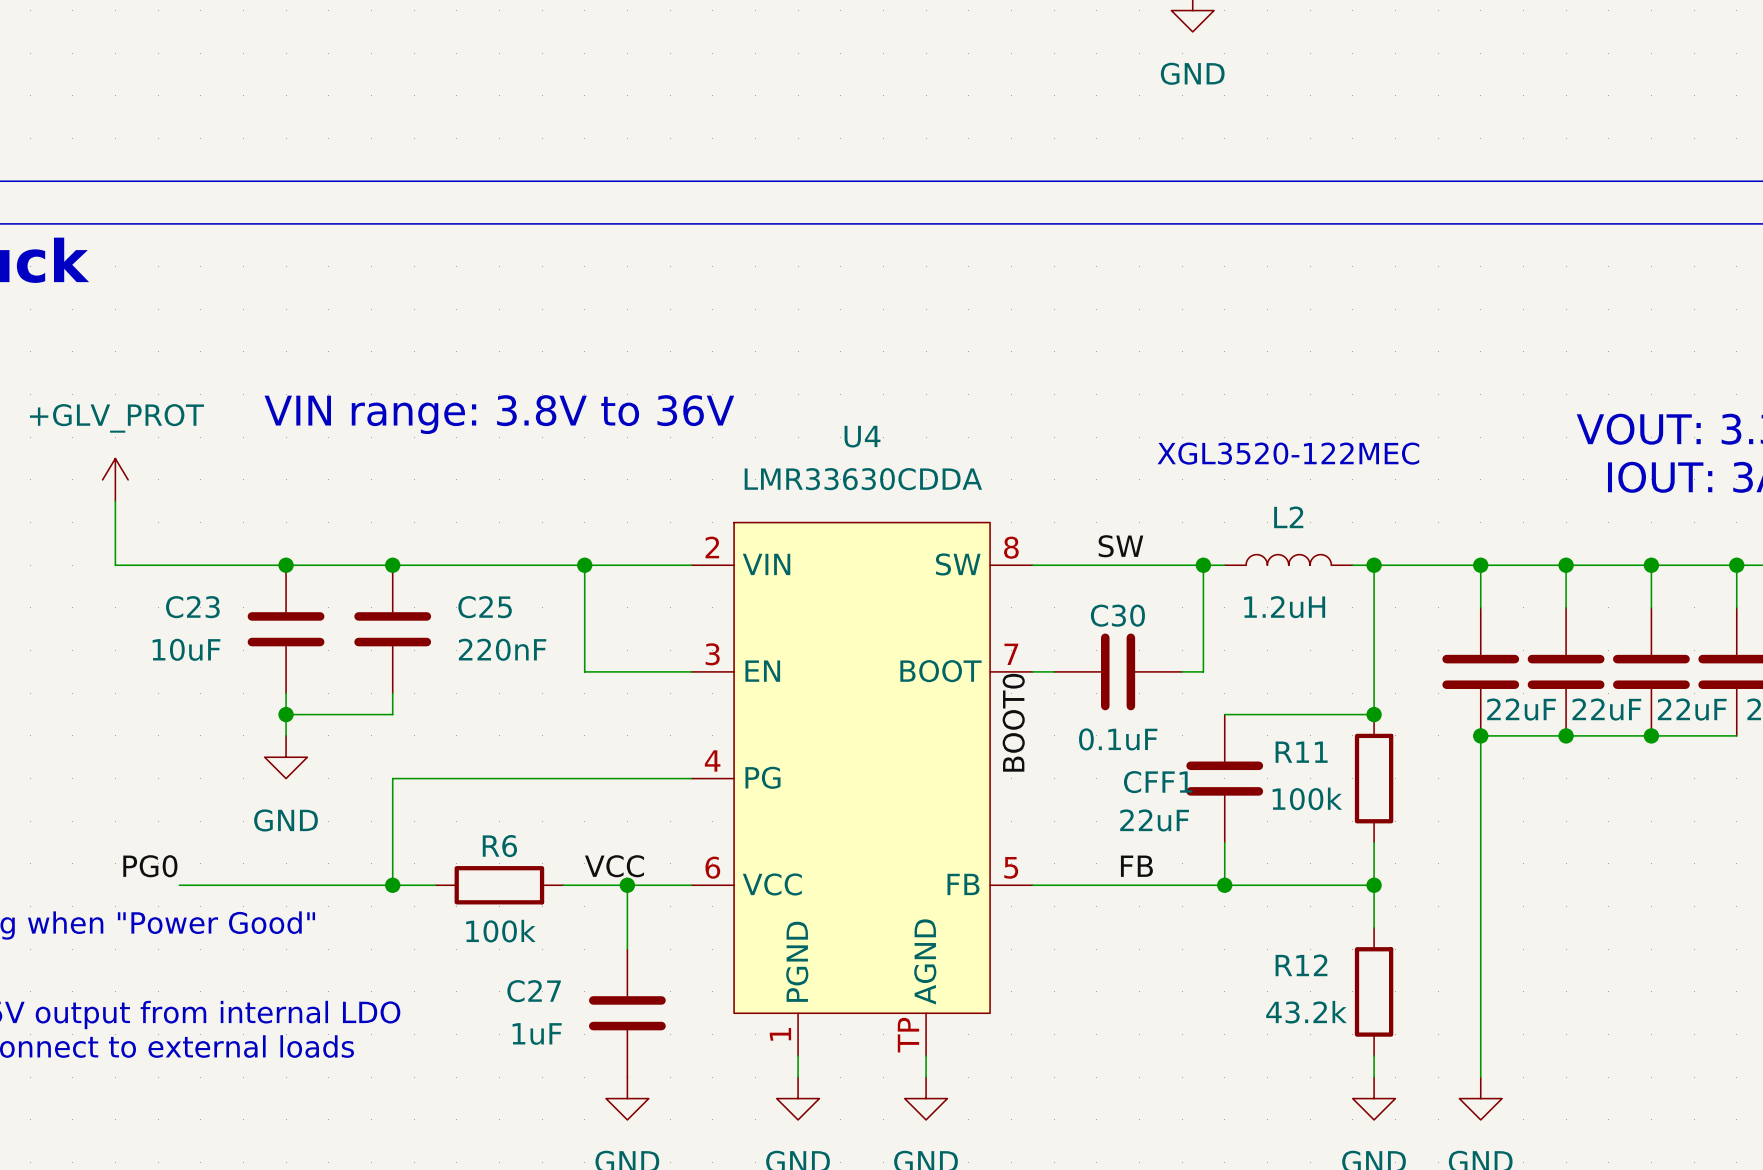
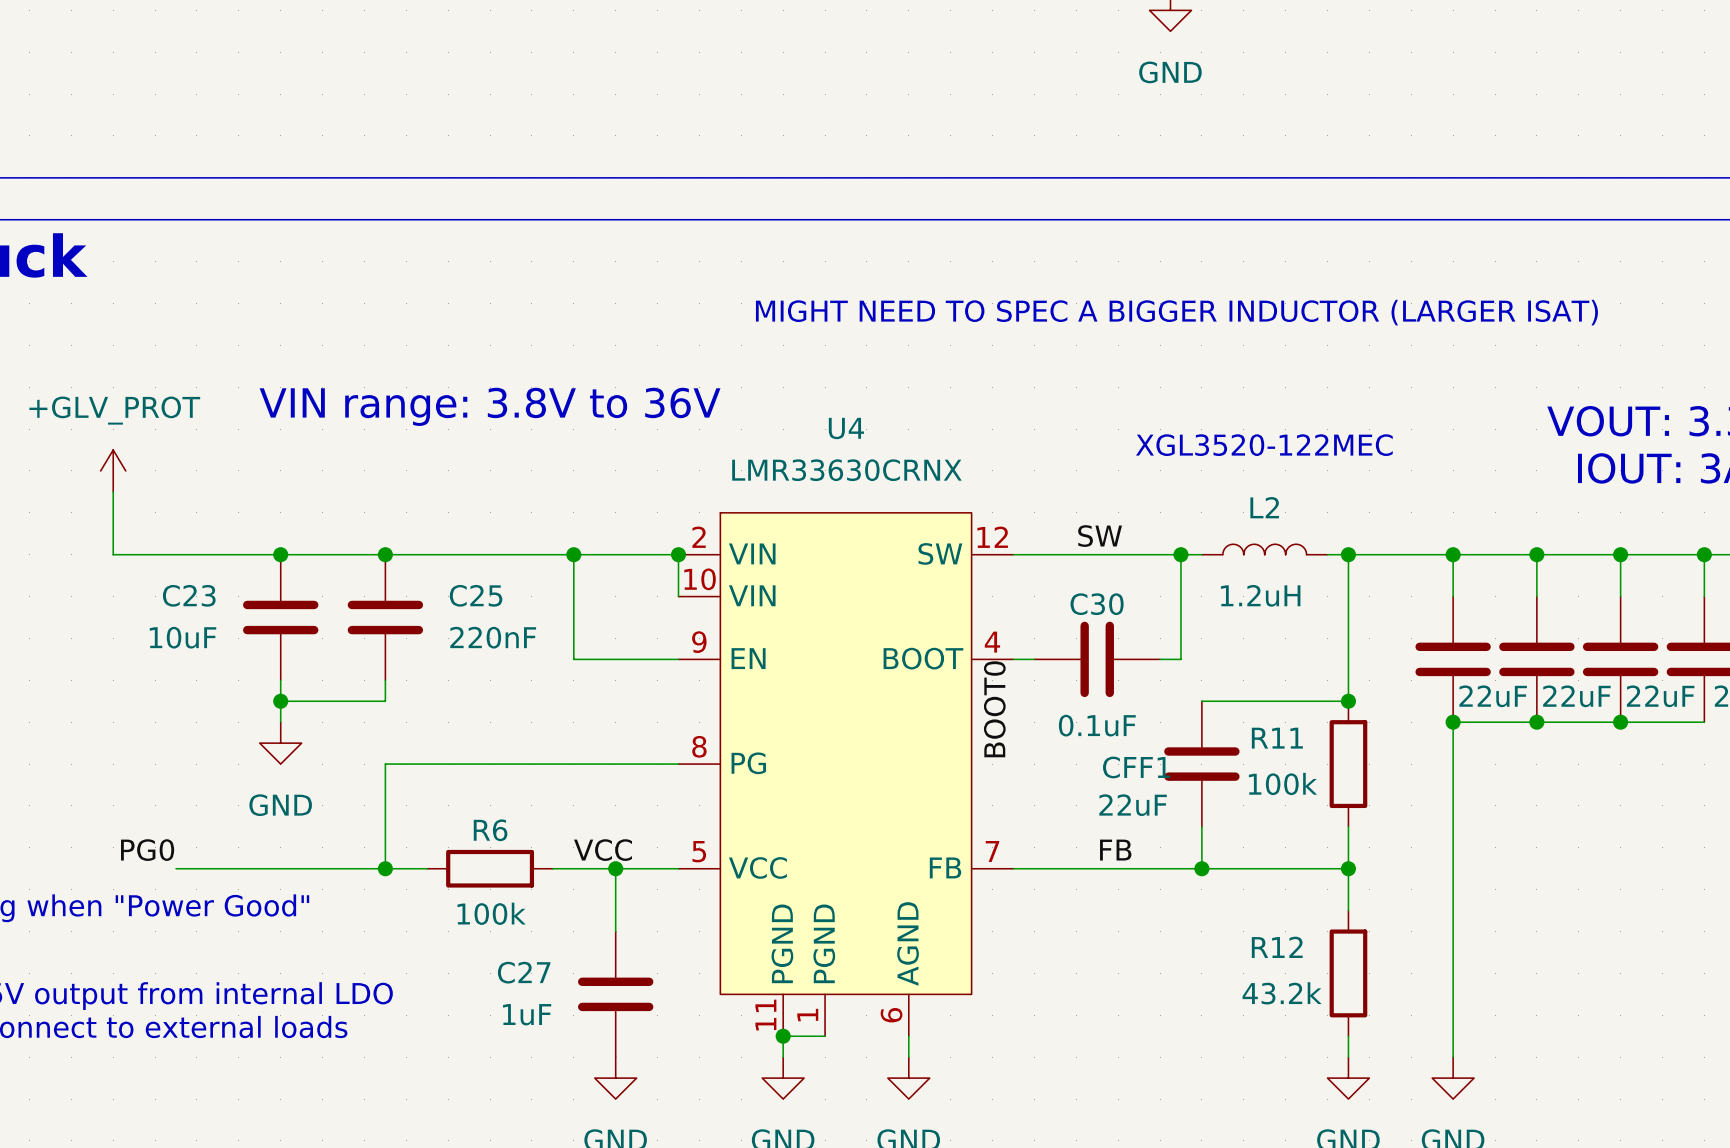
text: none -> MIGHT NEED TO SPEC A BIGGER INDUCTOR (LARGER ISAT) (1176, 312)
U4 value: LMR33630CDDA (863, 479) -> LMR33630CRNX (846, 470)
U4 symbol: [691, 522, 1033, 1056] -> [678, 512, 1014, 1037]
wire: none -> (678, 554) (678, 596)
junction: none -> (678, 554)
wire: none -> (783, 1036) (825, 1036)
junction: none -> (783, 1036)

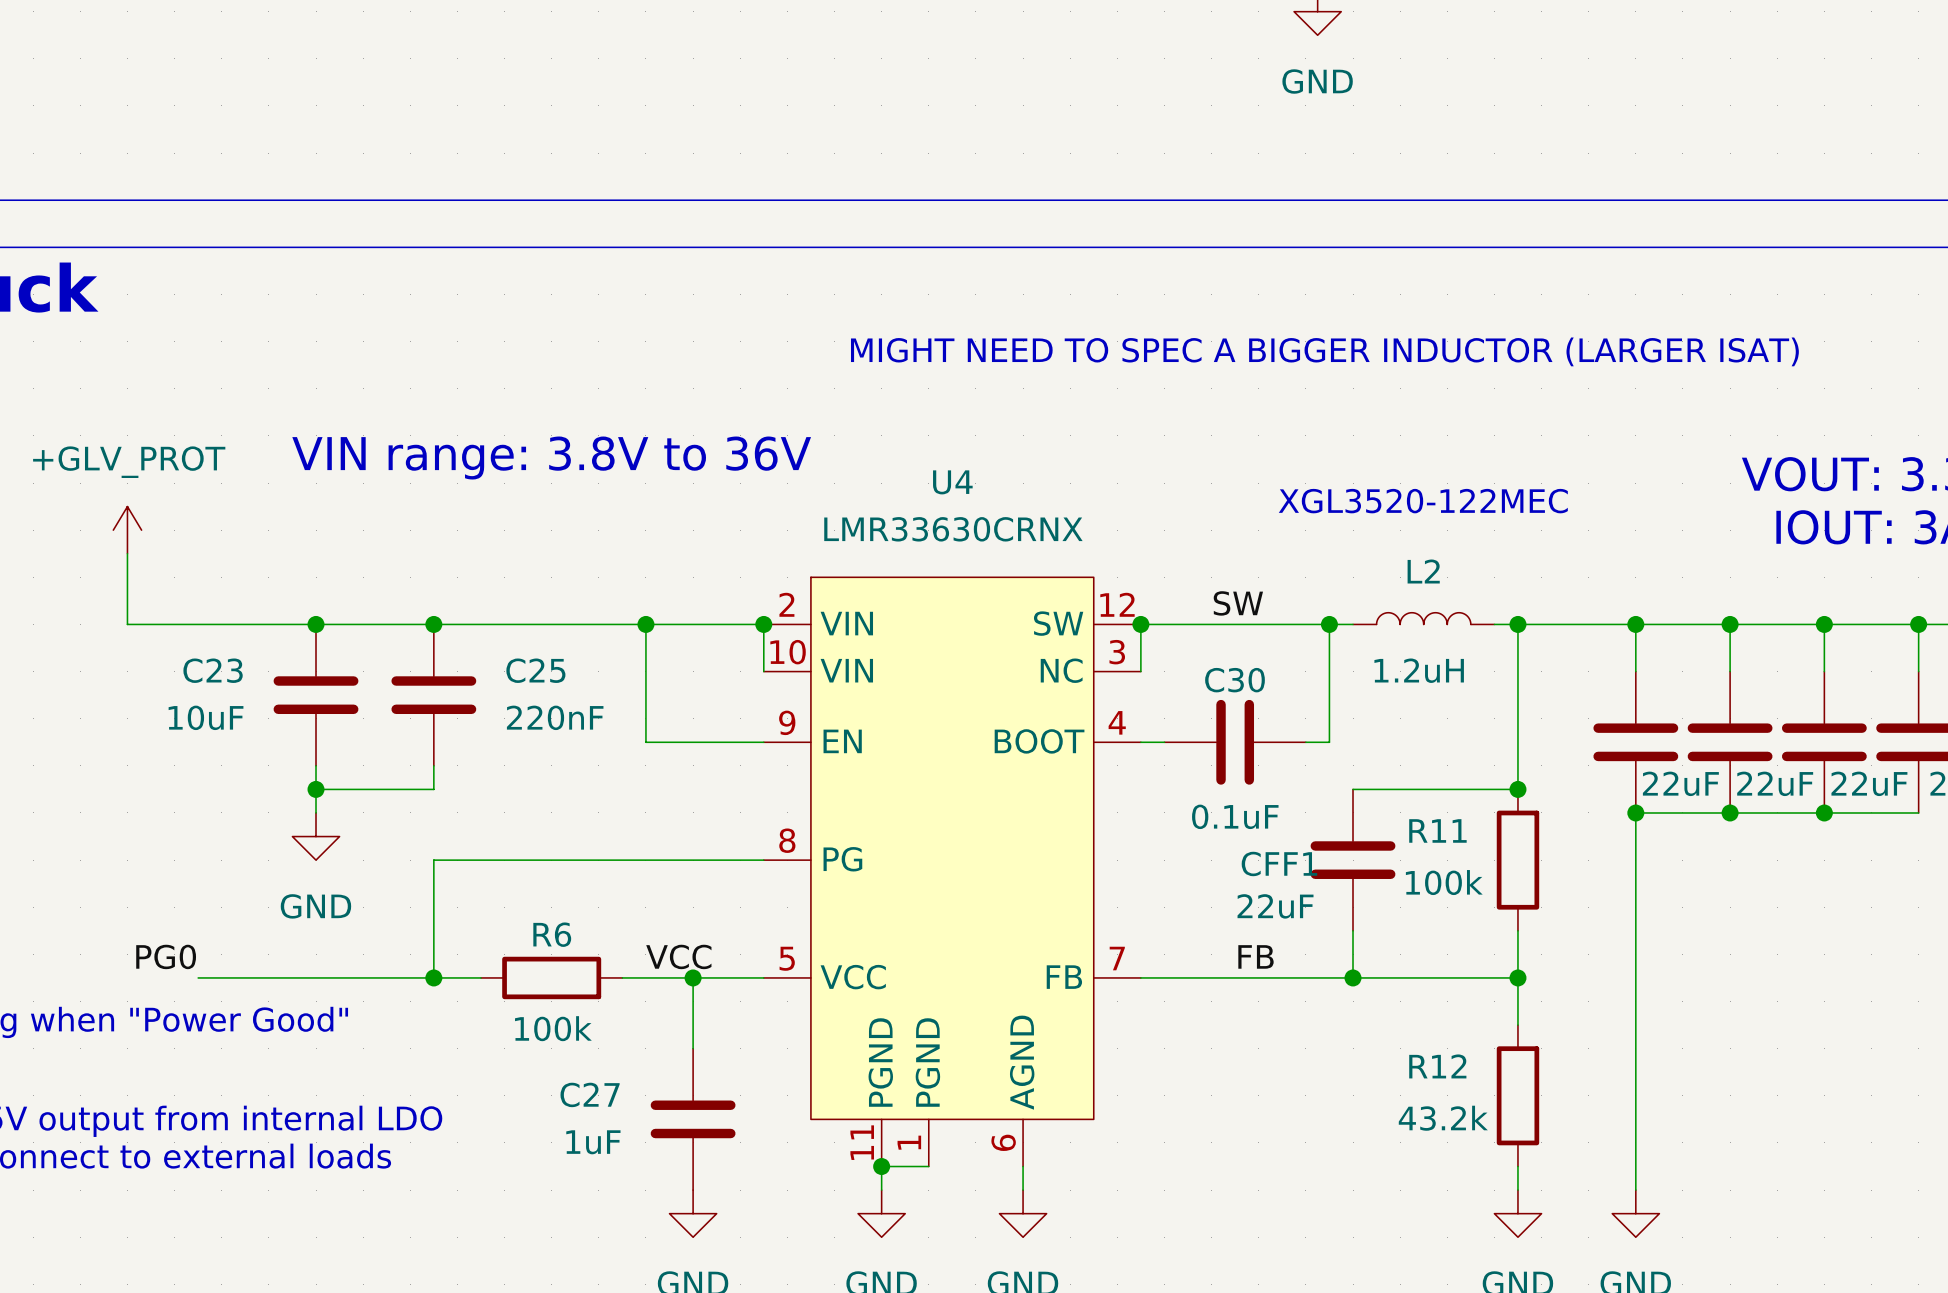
U4 symbol: [678, 512, 1014, 1037] -> [763, 577, 1141, 1167]
wire: none -> (1140, 624) (1140, 671)
junction: none -> (1140, 624)
label: BOOT0 (994, 709) -> none

